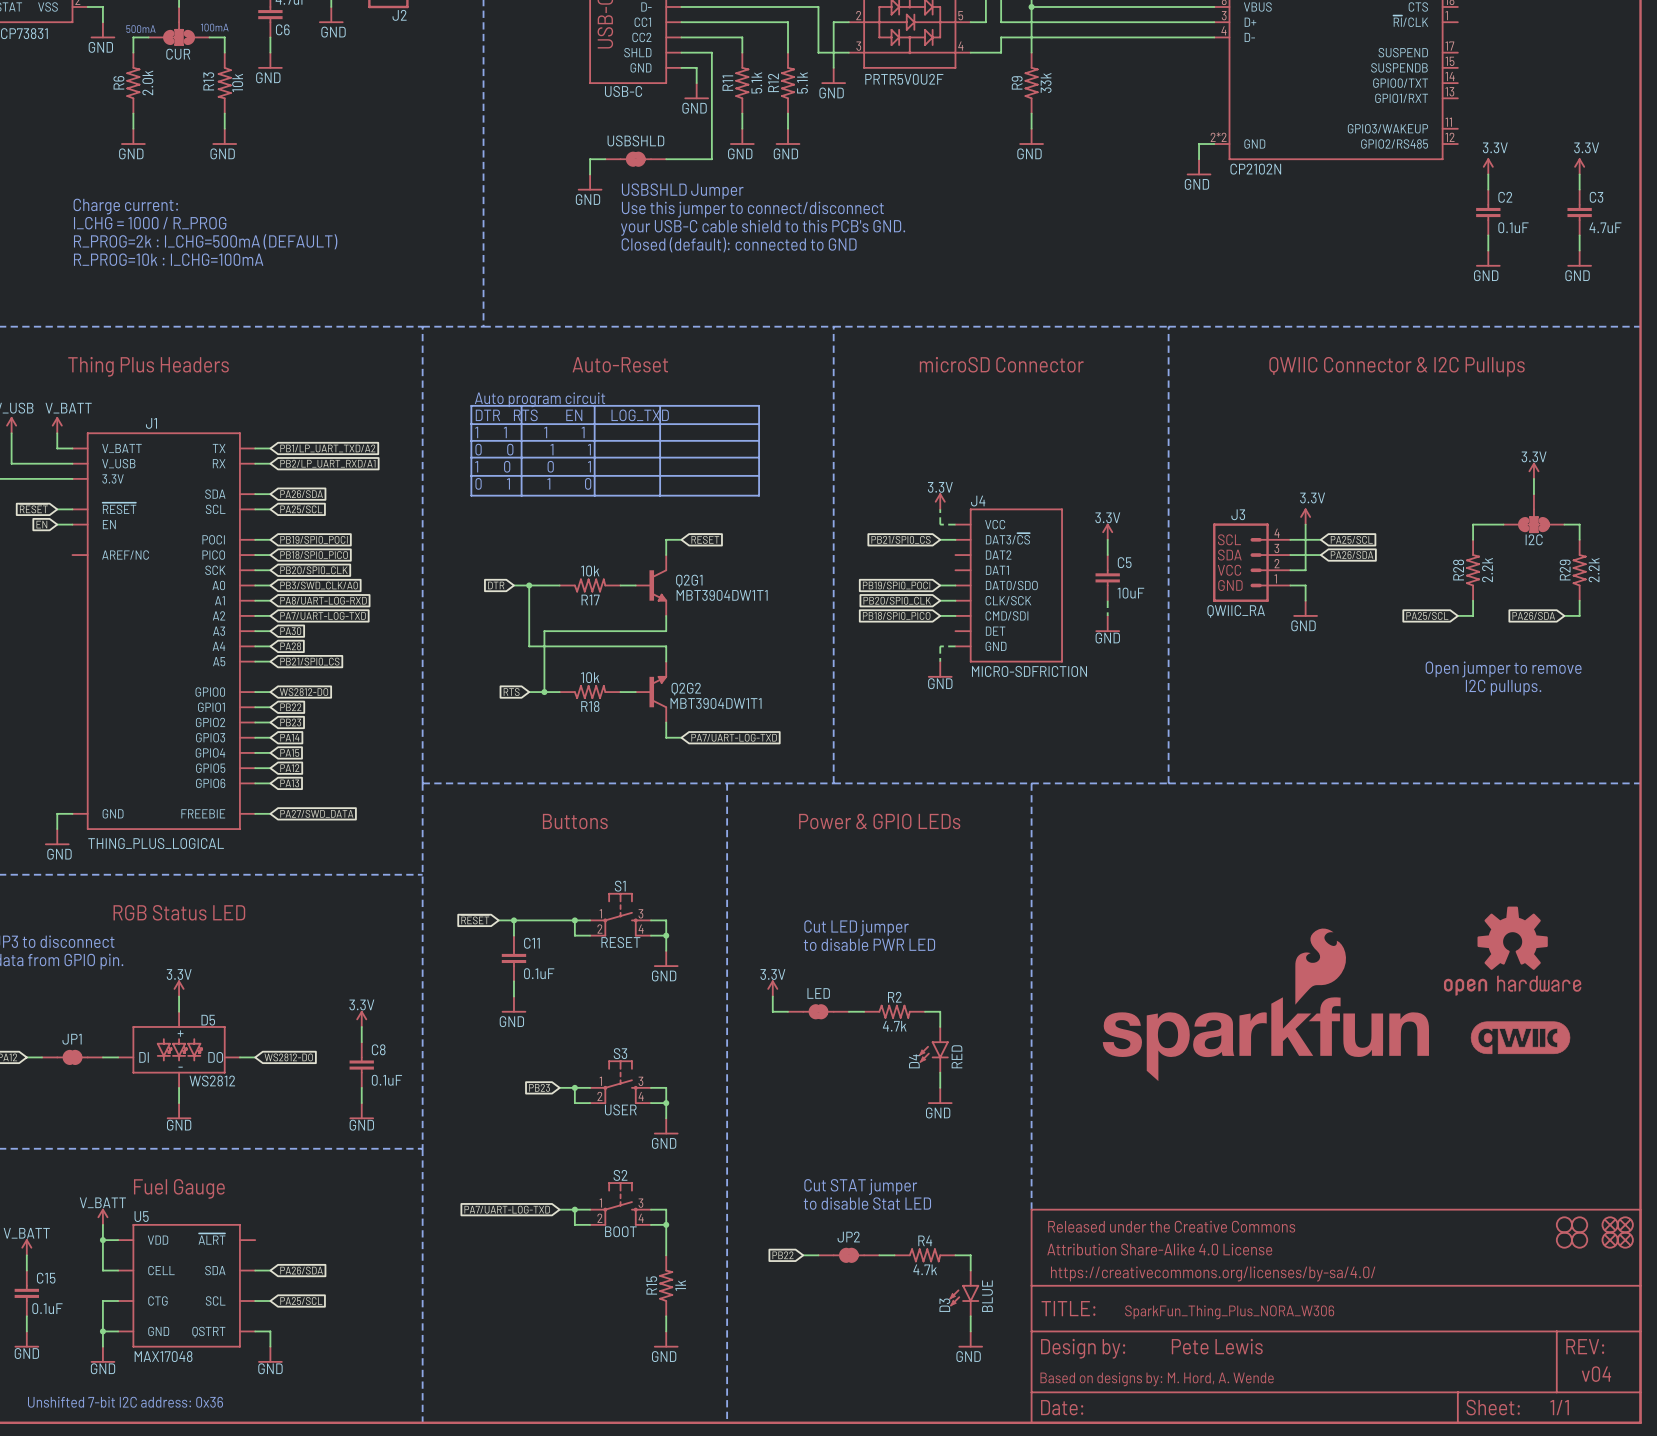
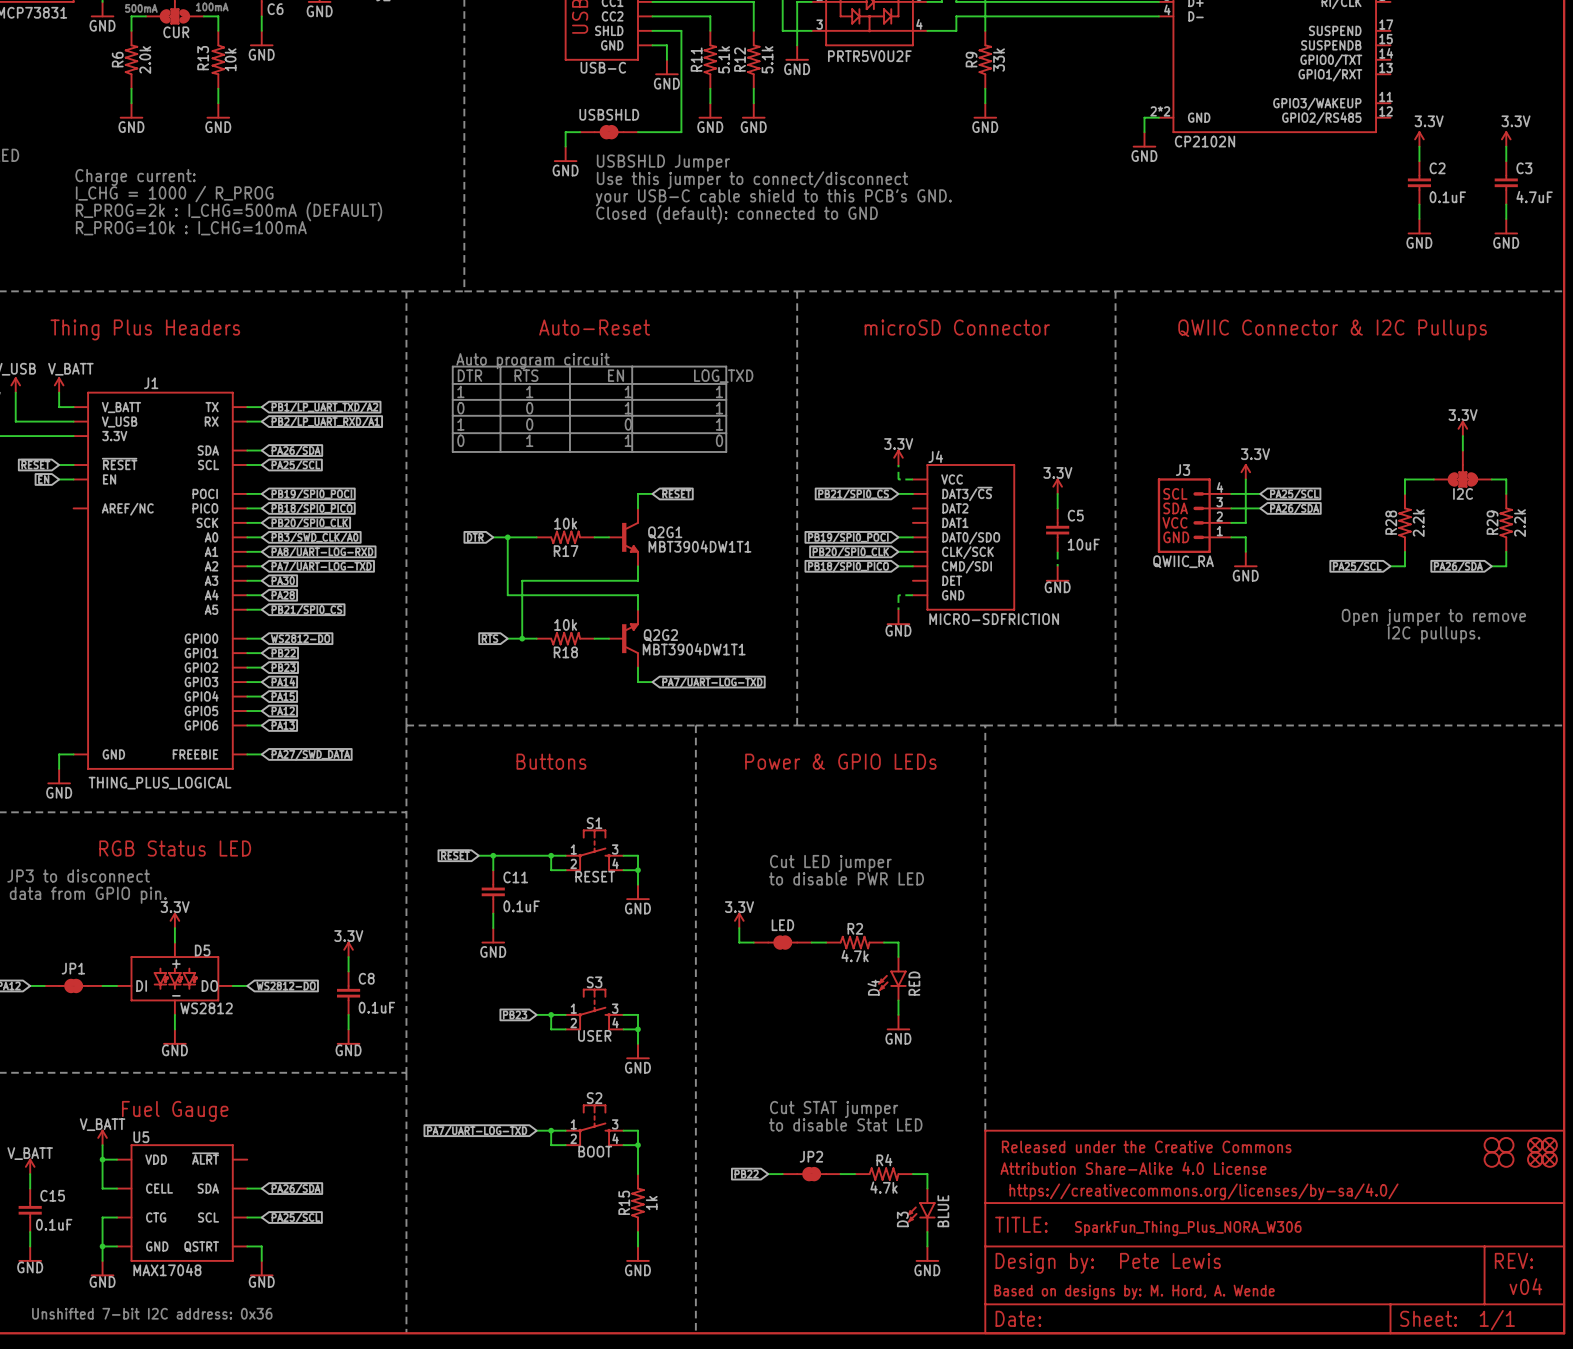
part: (1512, 951) -> none
part: (1265, 1004) -> none
part: (1520, 1037) -> none

